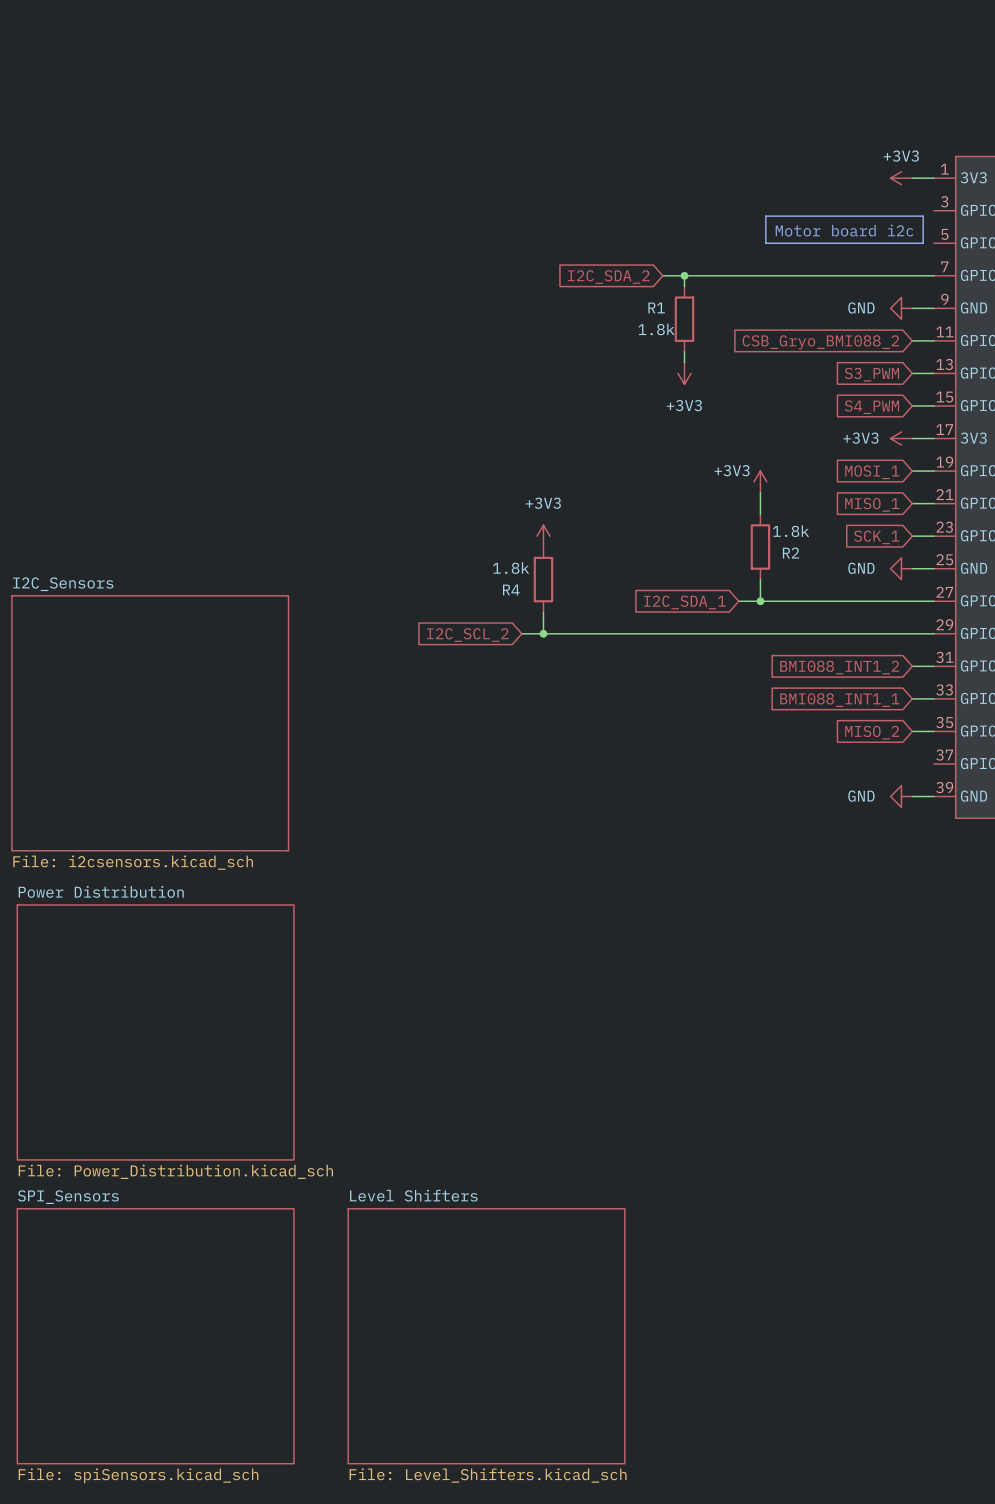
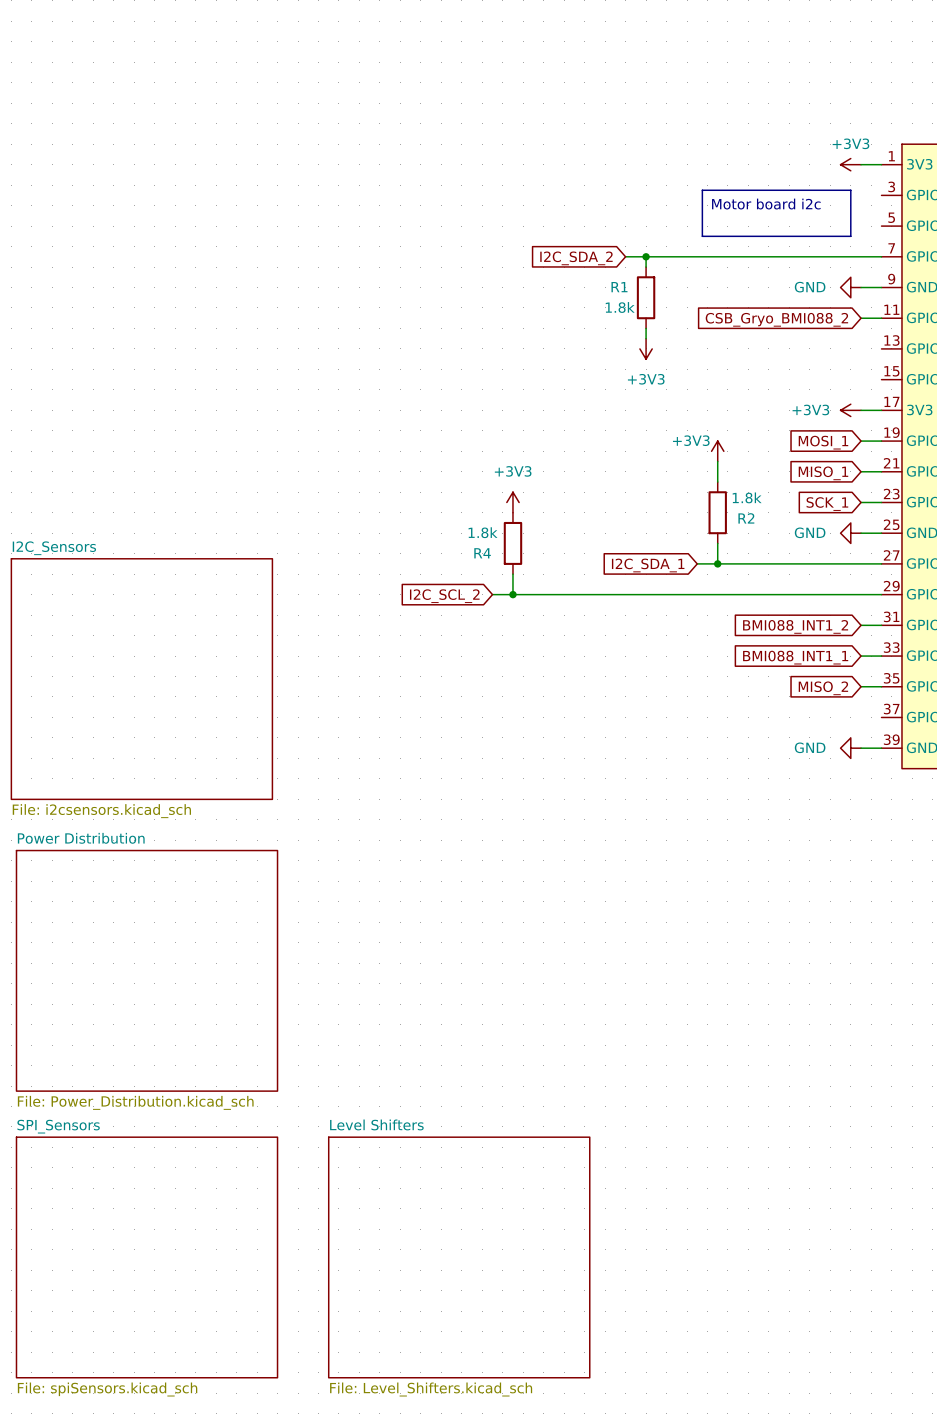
line: none -> (702, 190) (850, 190) (850, 236) (702, 236) (702, 190)
line: (765, 216) (923, 216) (923, 243) (765, 243) (765, 216) -> none
text position: Motor board i2c (844, 230) -> Motor board i2c (766, 204)
wire: (912, 373) (934, 373) -> none
global label: S3_PWM (871, 374) -> none
wire: (912, 405) (934, 405) -> none
global label: S4_PWM (871, 407) -> none

